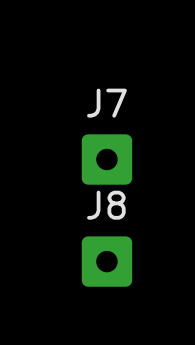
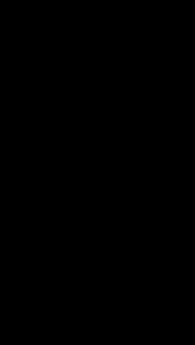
J7: (106, 159) -> none
J8: (106, 261) -> none

